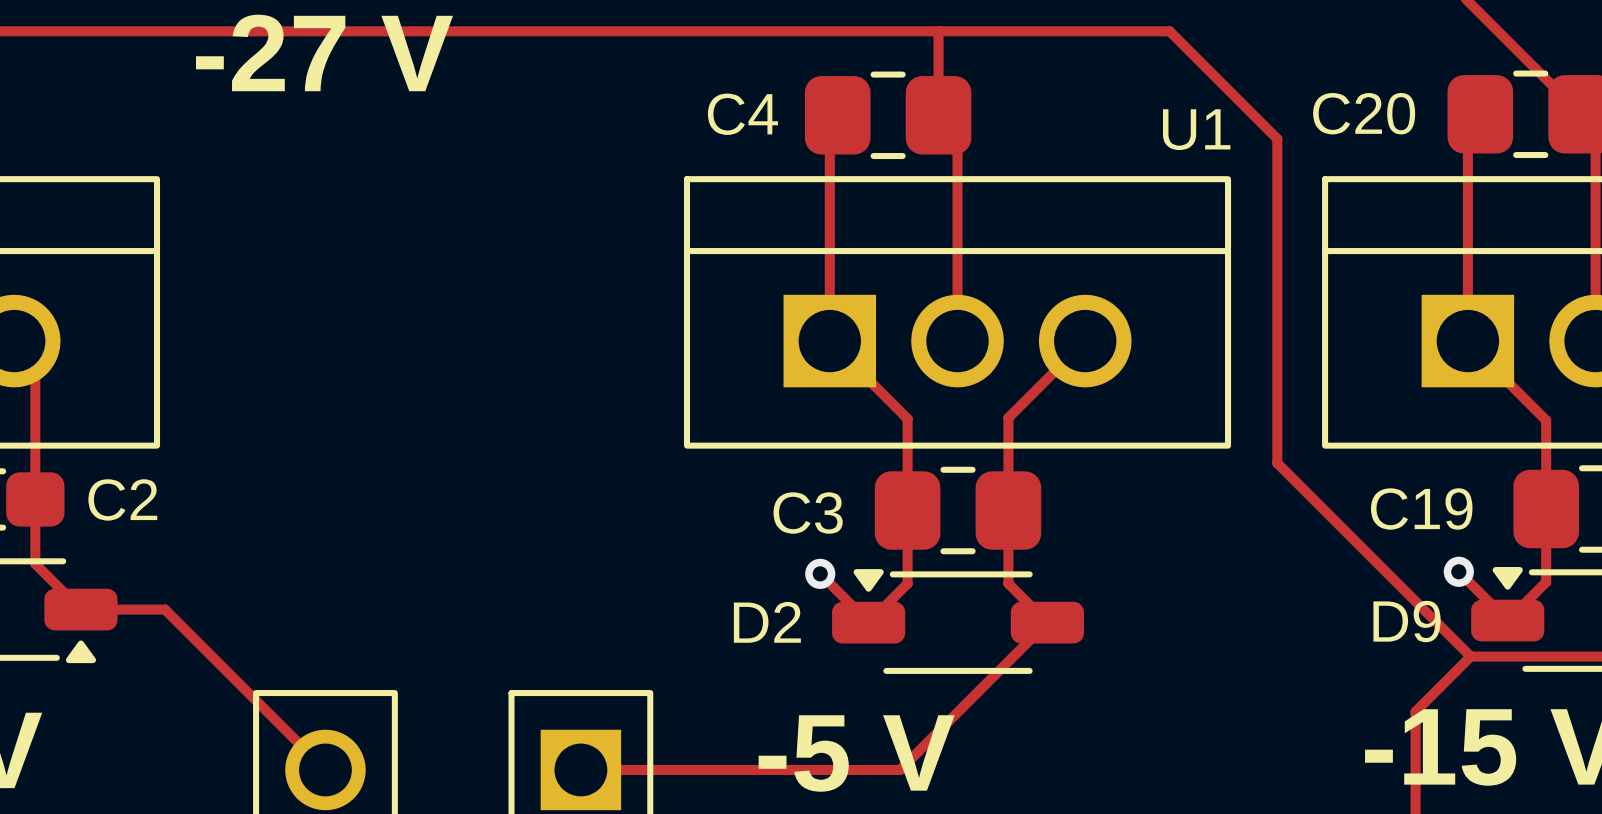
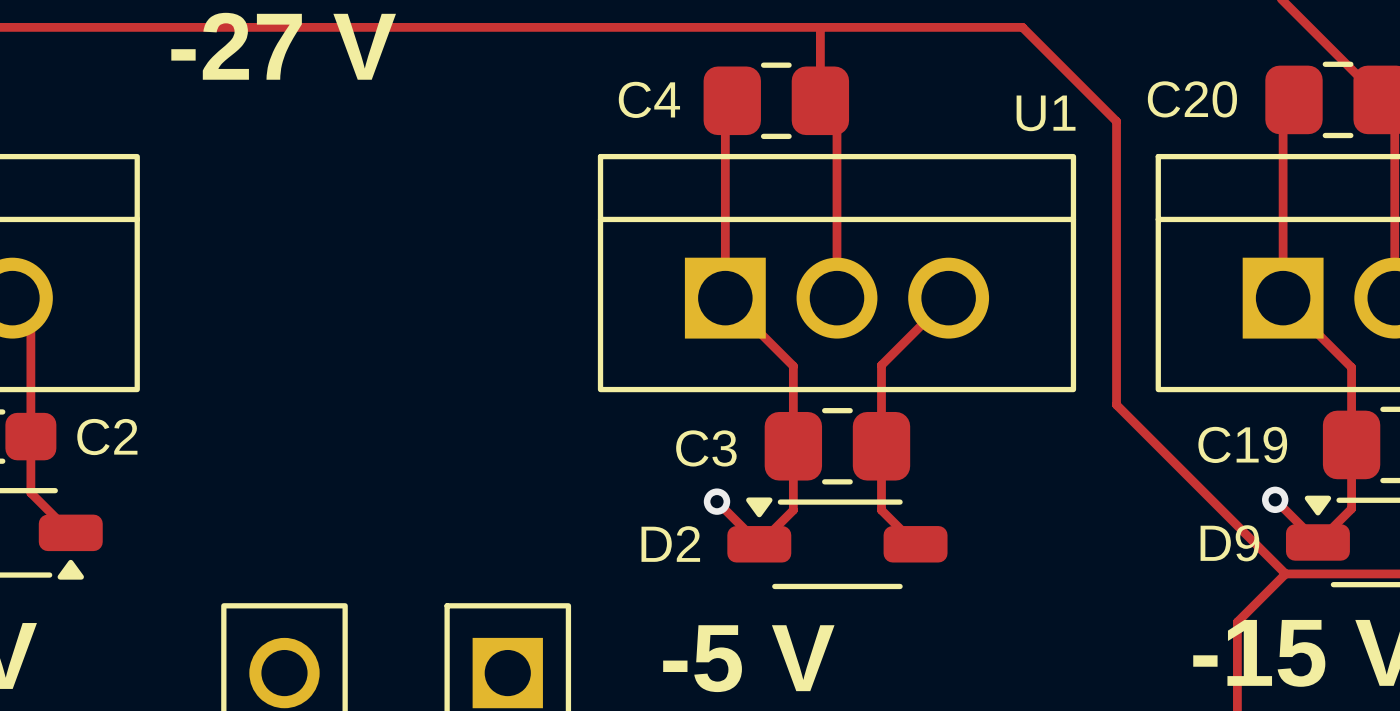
track: (80, 609) (165, 609) (325, 769) -> none
track: (1047, 622) (900, 769) (580, 769) -> none

